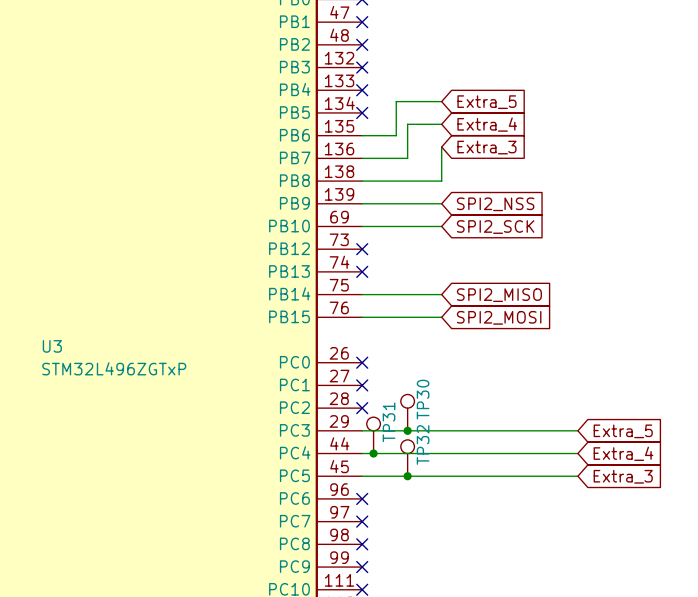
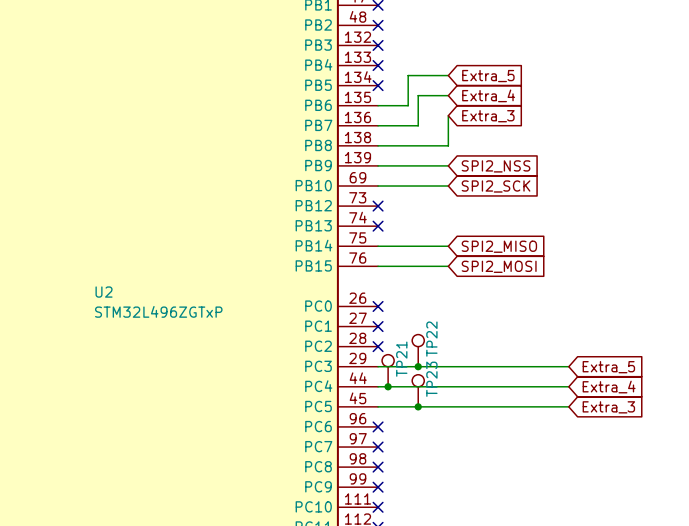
U3 name: U3 (52, 346) -> U2 (104, 292)
TP30 name: TP30 (423, 399) -> TP22 (431, 339)
TP31 name: TP31 (389, 422) -> TP21 (401, 359)
TP32 name: TP32 (423, 444) -> TP23 (431, 379)

